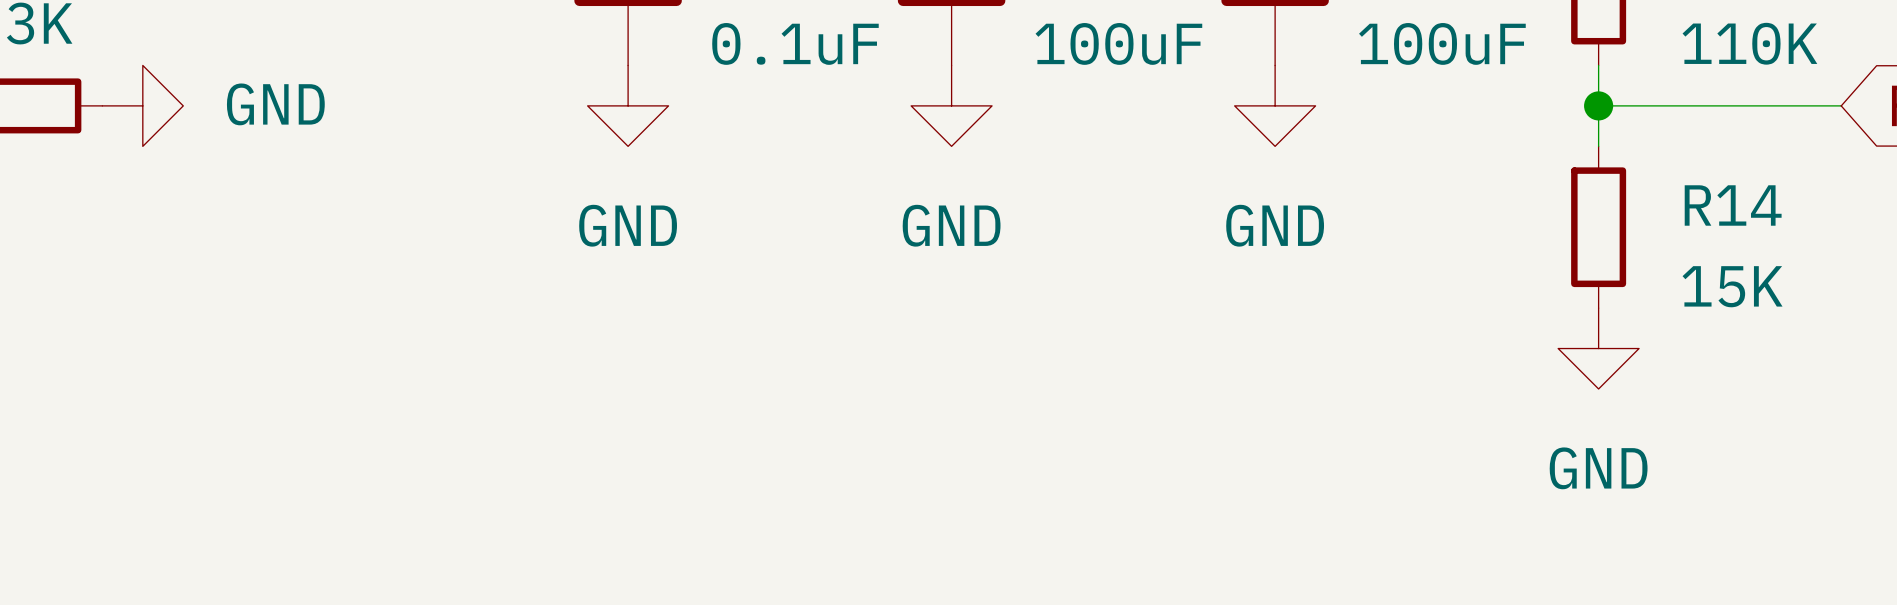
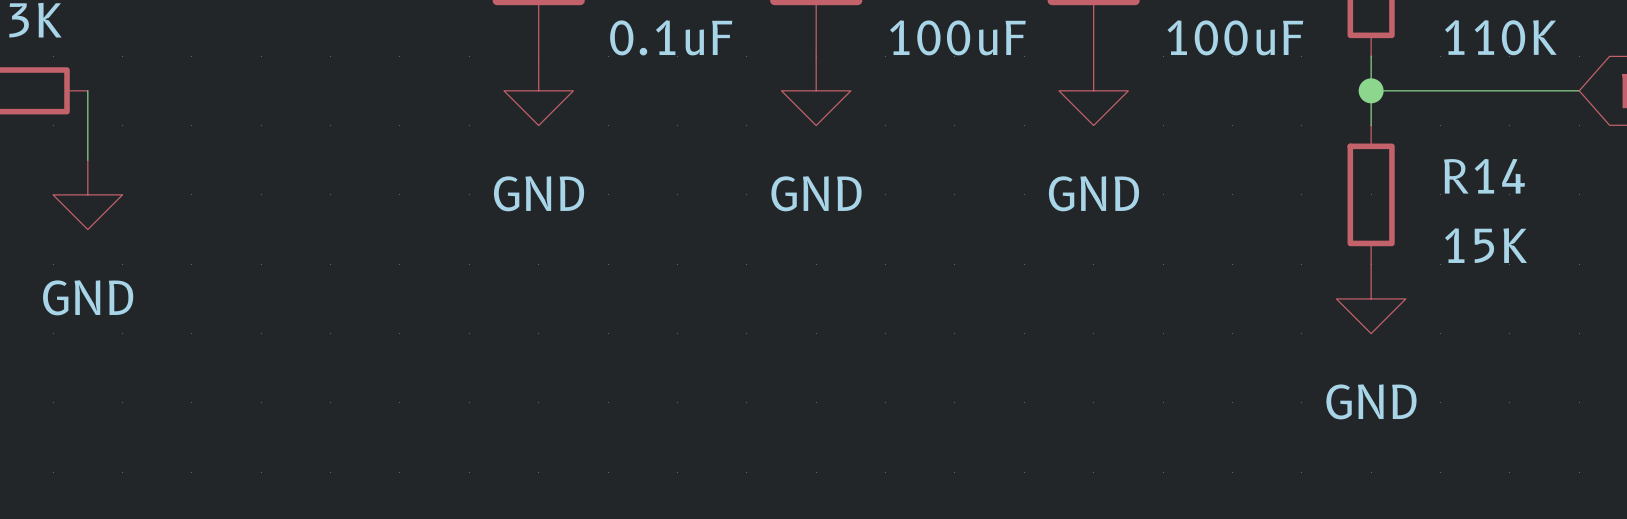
wire: none -> (87, 90) (87, 160)
power symbol rotation: 0° (142, 105) -> 90° clockwise (87, 194)
power symbol position: GND (142, 105) -> GND (87, 194)

